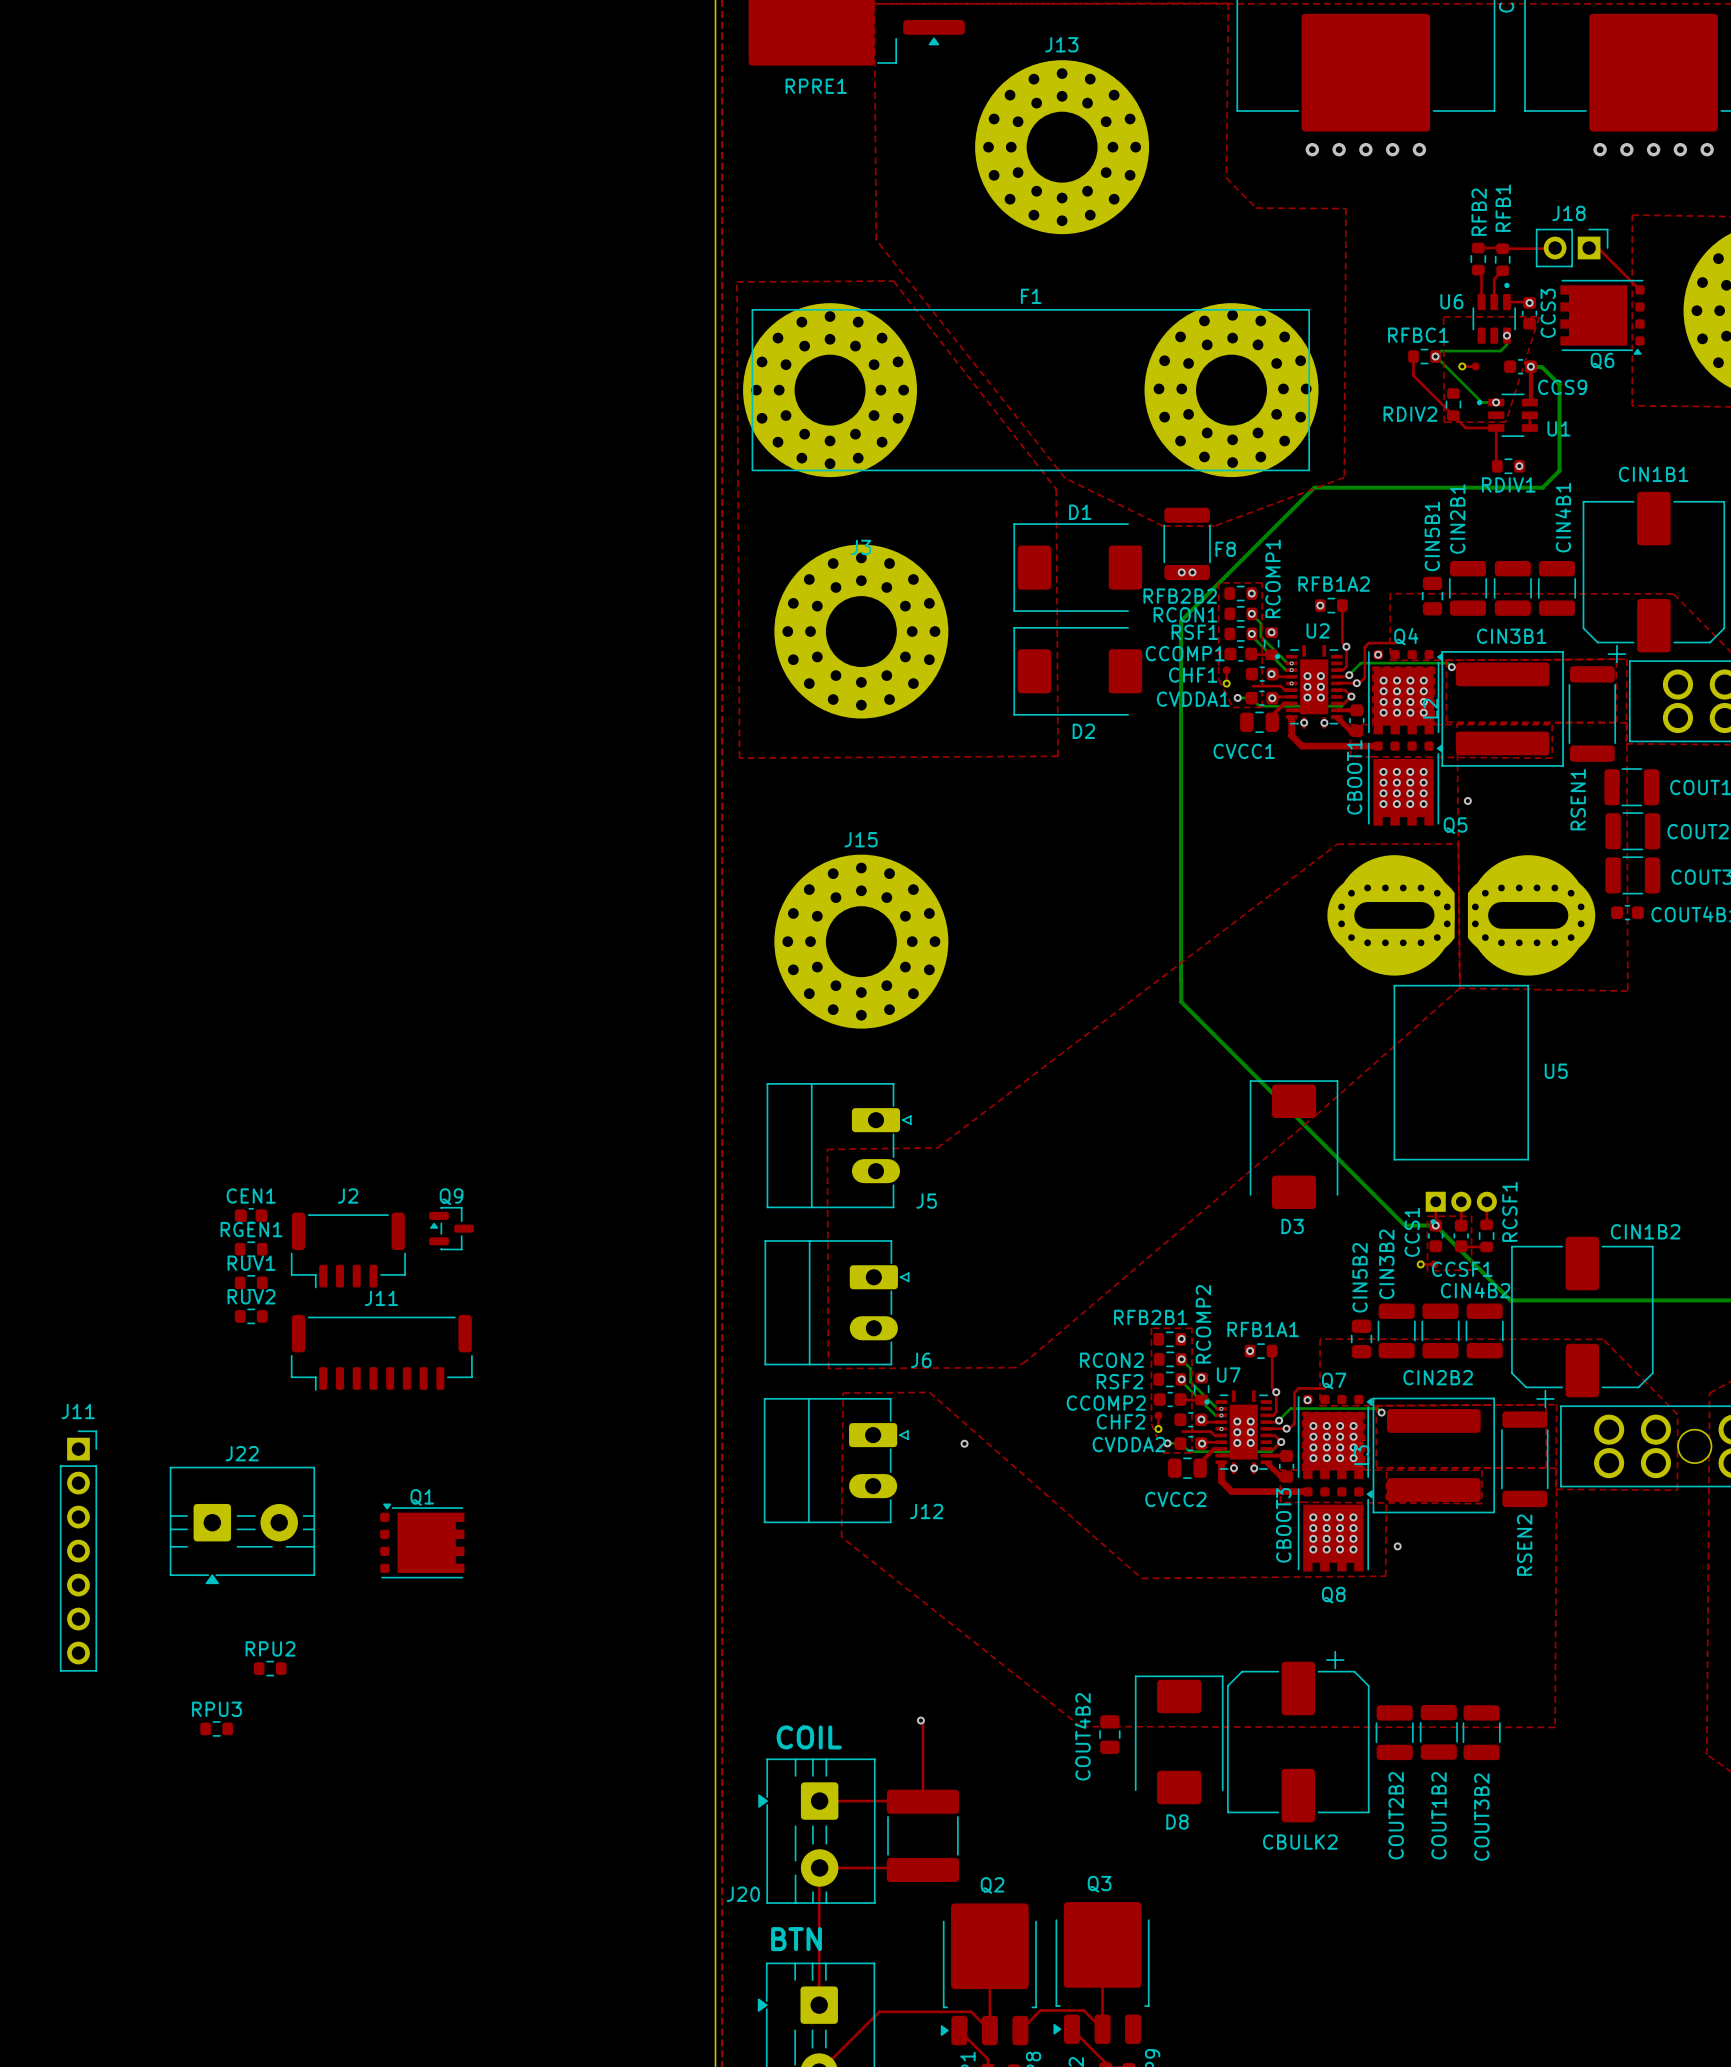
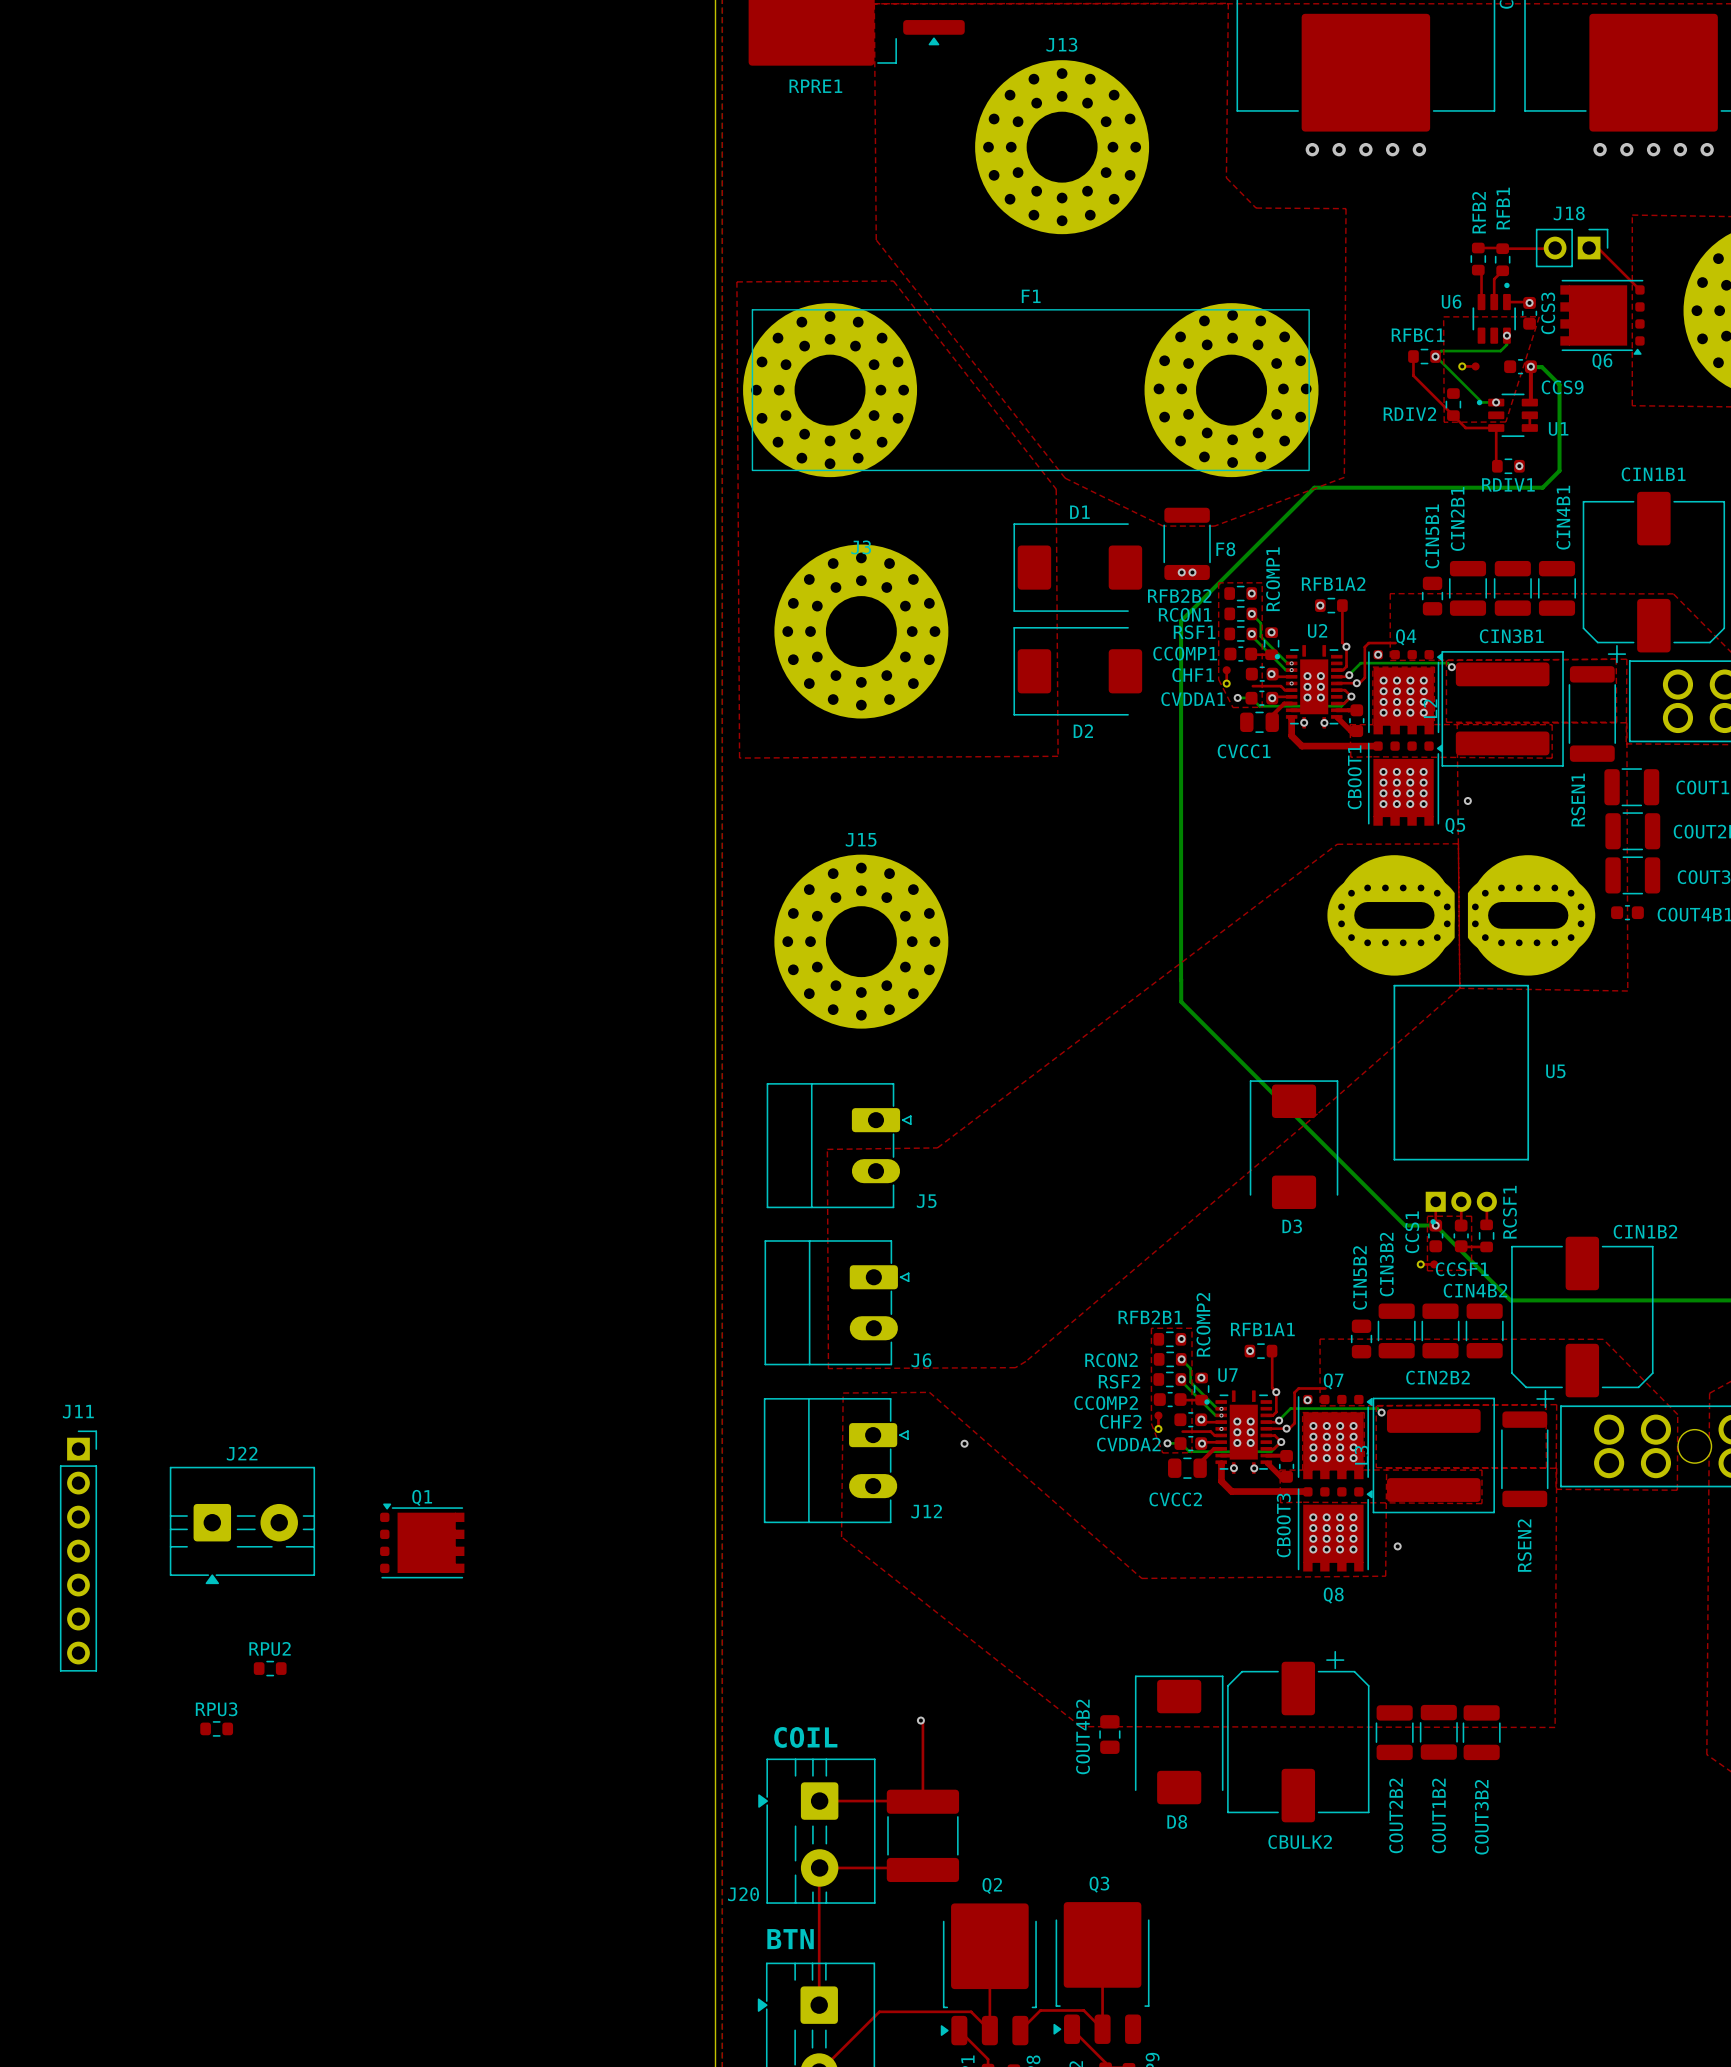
CEN1: (251, 1215) -> none
Q9: (451, 1228) -> none
RGEN1: (251, 1249) -> none
J2: (348, 1250) -> none
RUV1: (251, 1282) -> none
RUV2: (251, 1316) -> none
J11: (381, 1352) -> none

